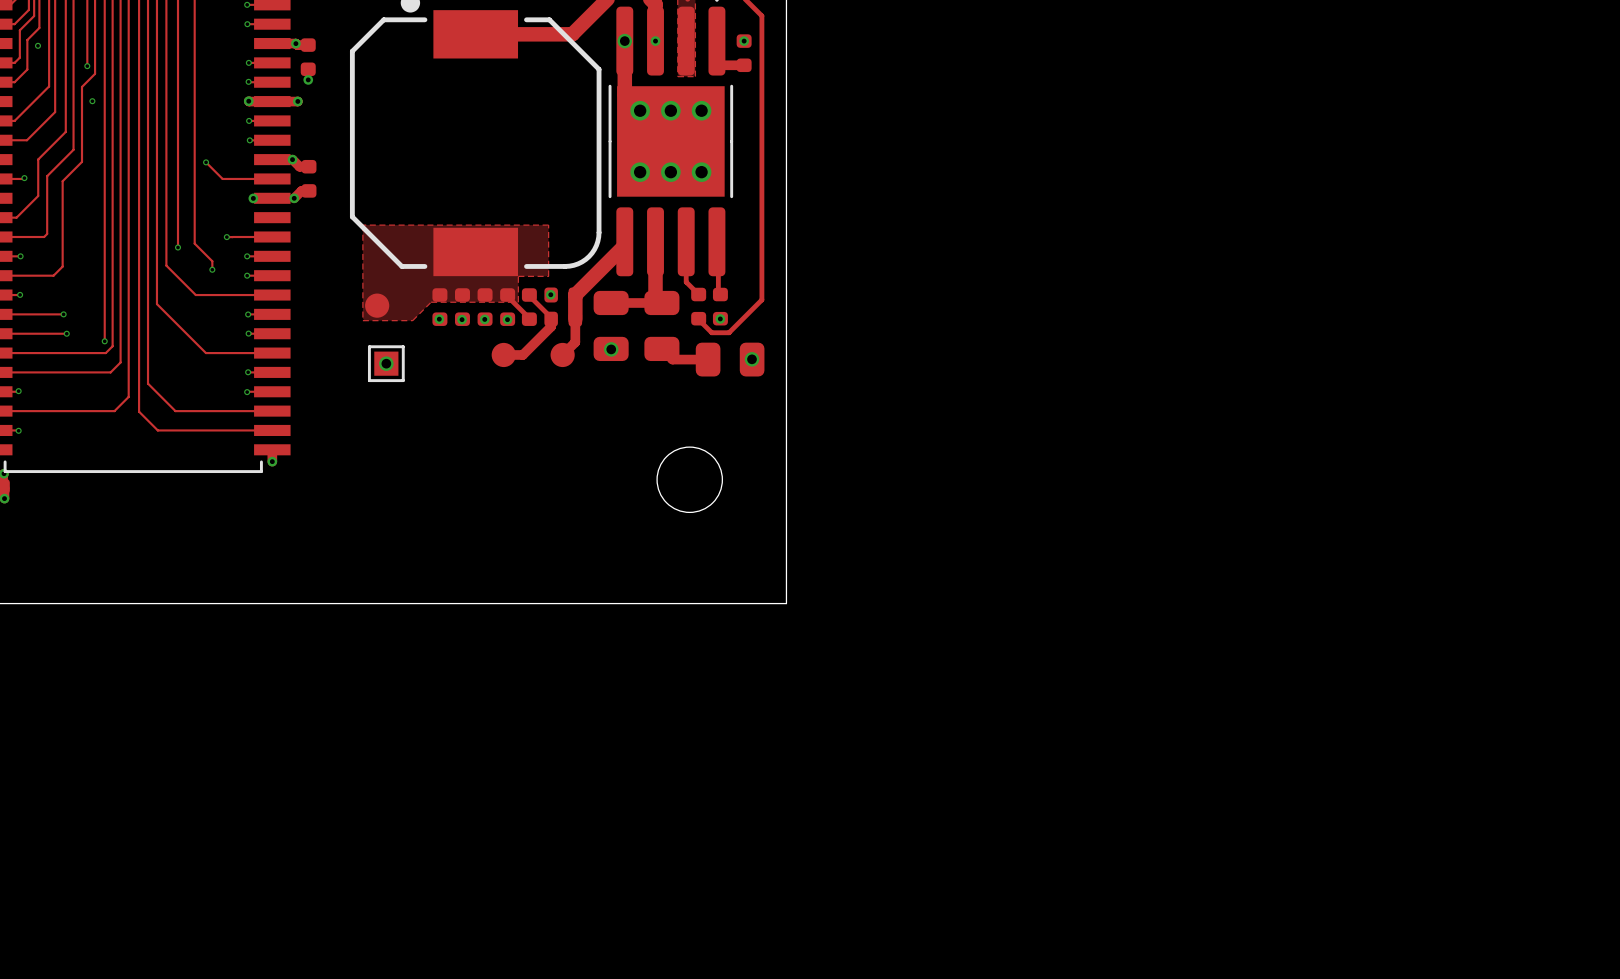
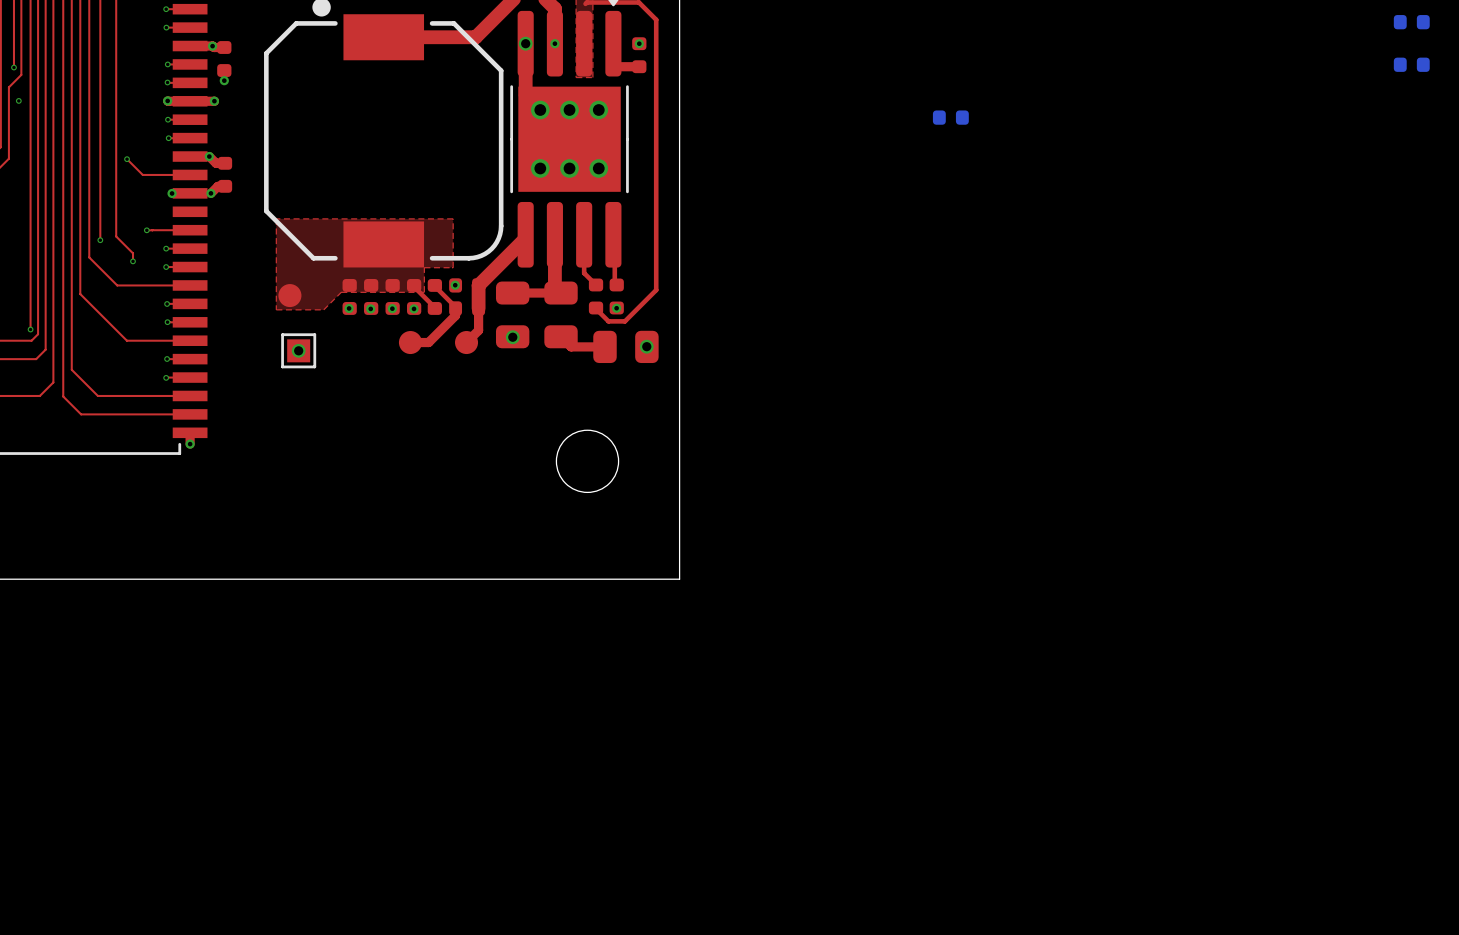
part: none -> (1411, 22)
part: none -> (1411, 64)
part: none -> (950, 117)

